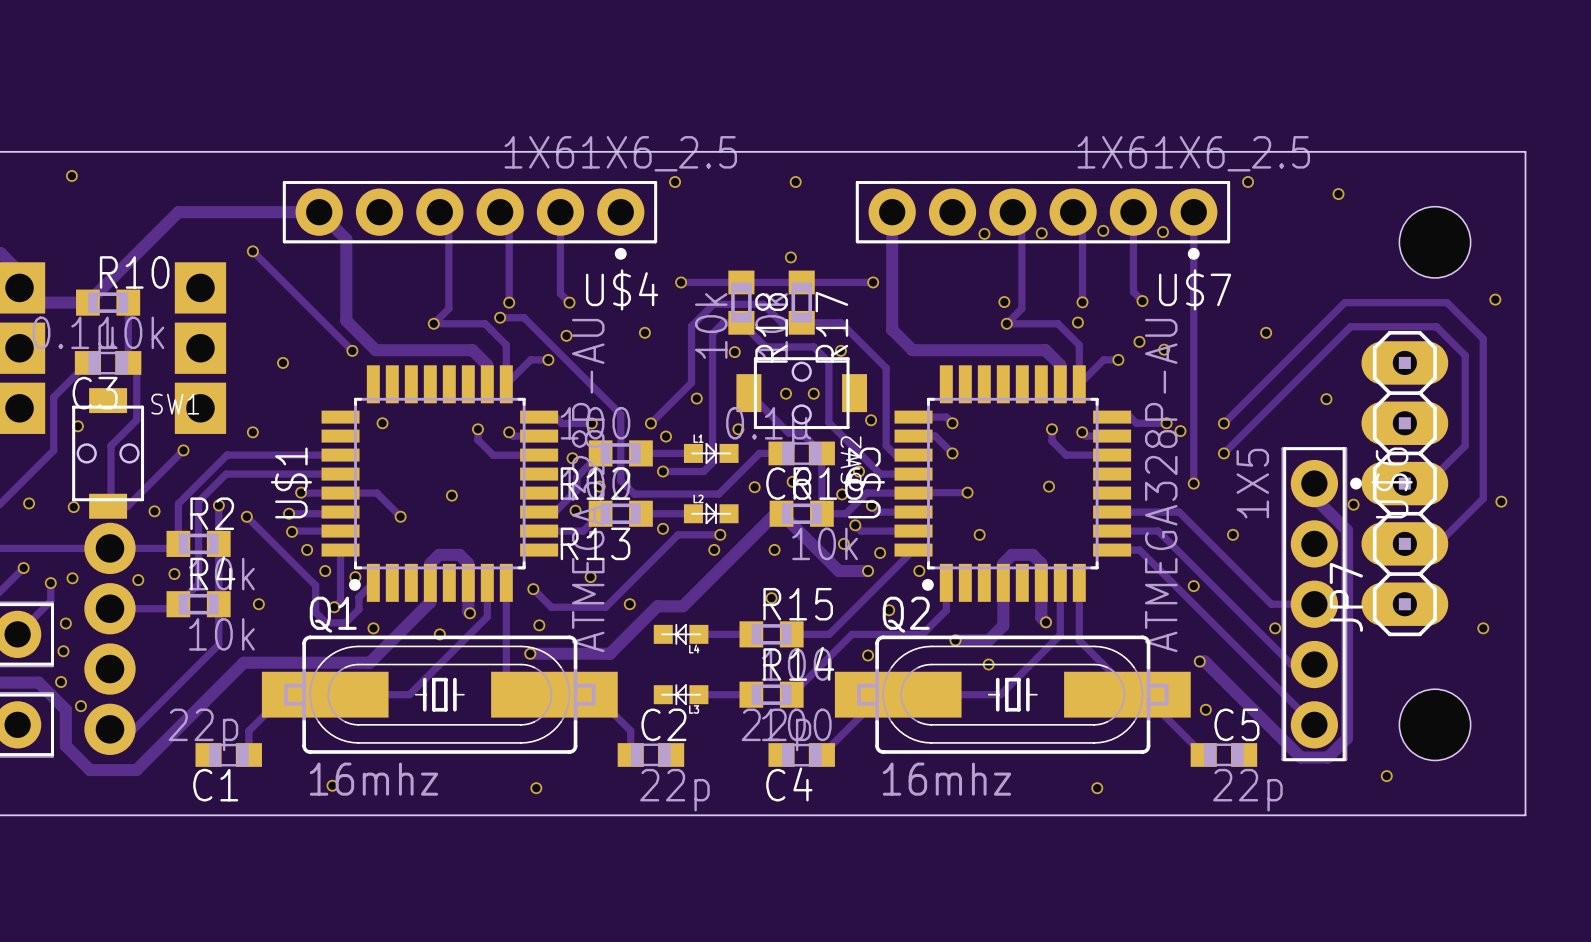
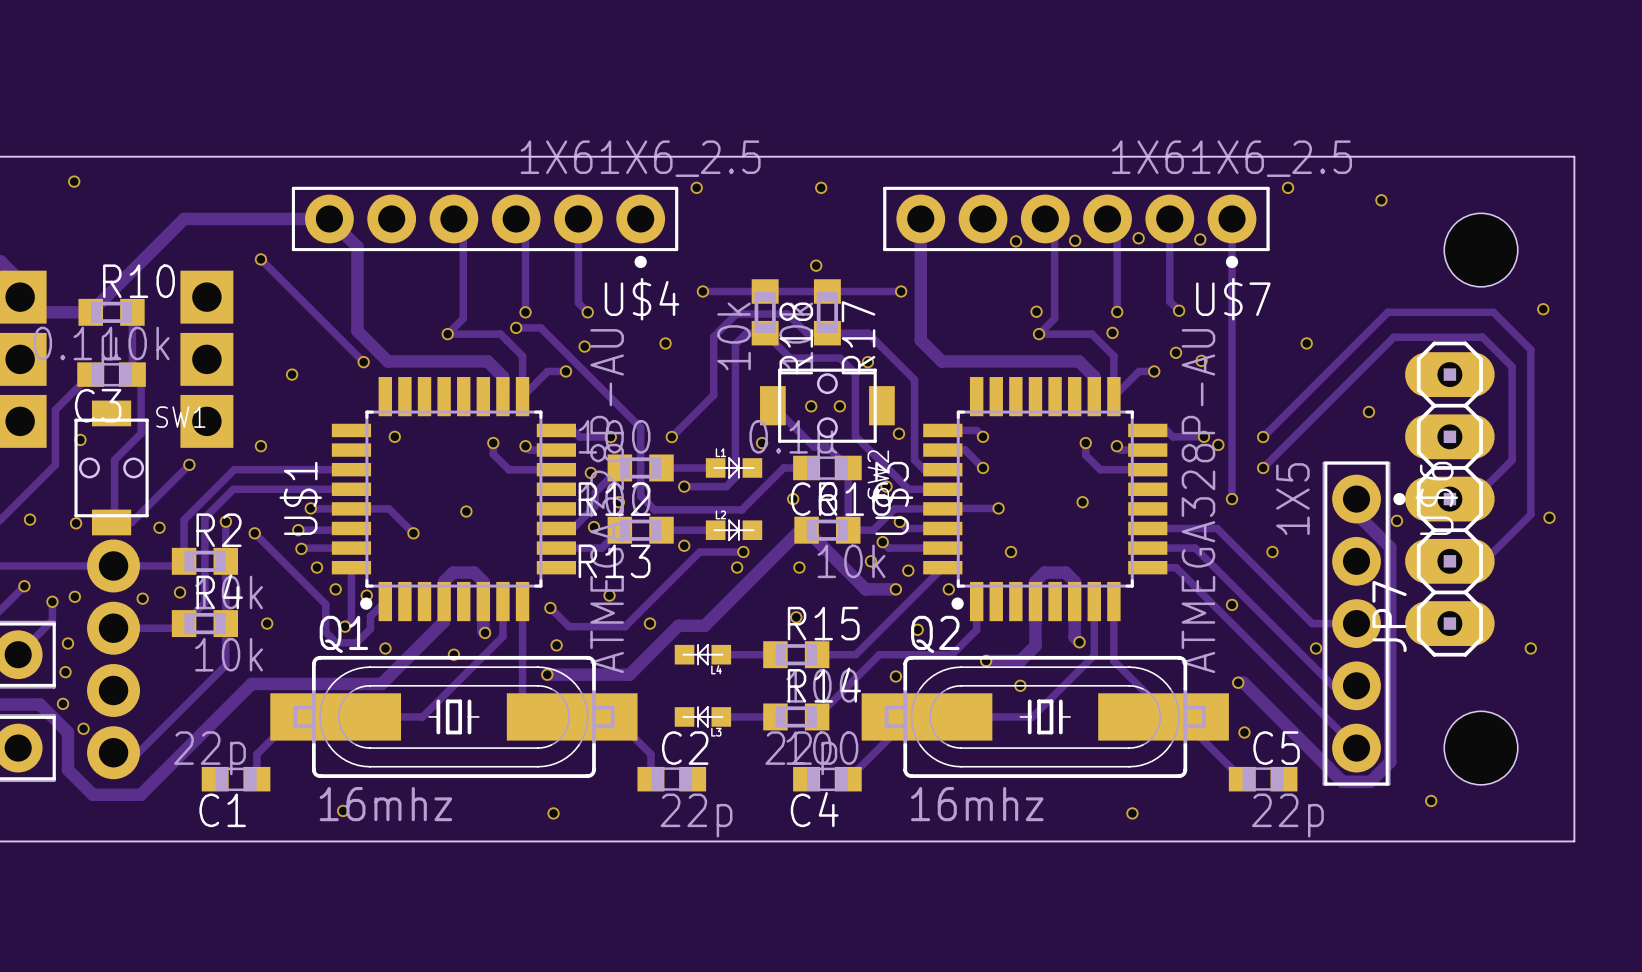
via: (734, 352) -> none
via: (696, 398) -> none
via: (666, 436) -> none
via: (792, 481) -> none
via: none -> (793, 499)
via: (754, 487) -> none
via: (842, 494) -> none

